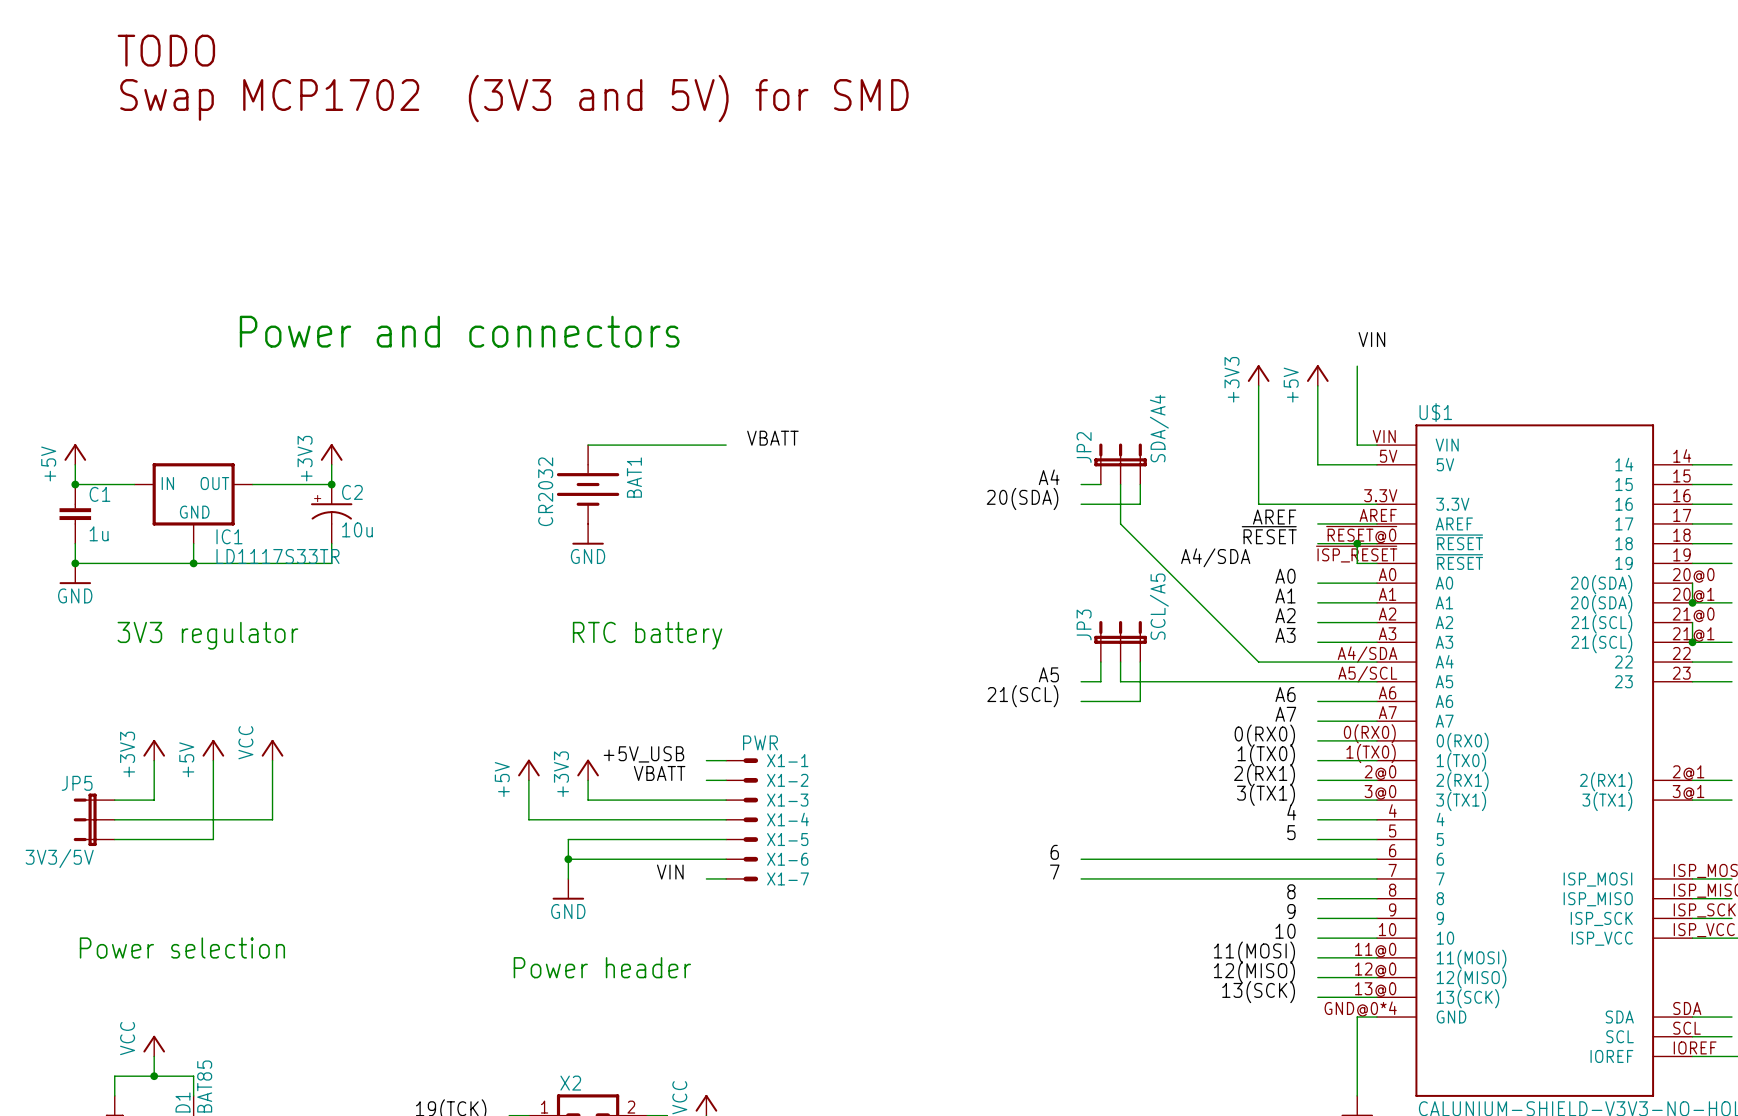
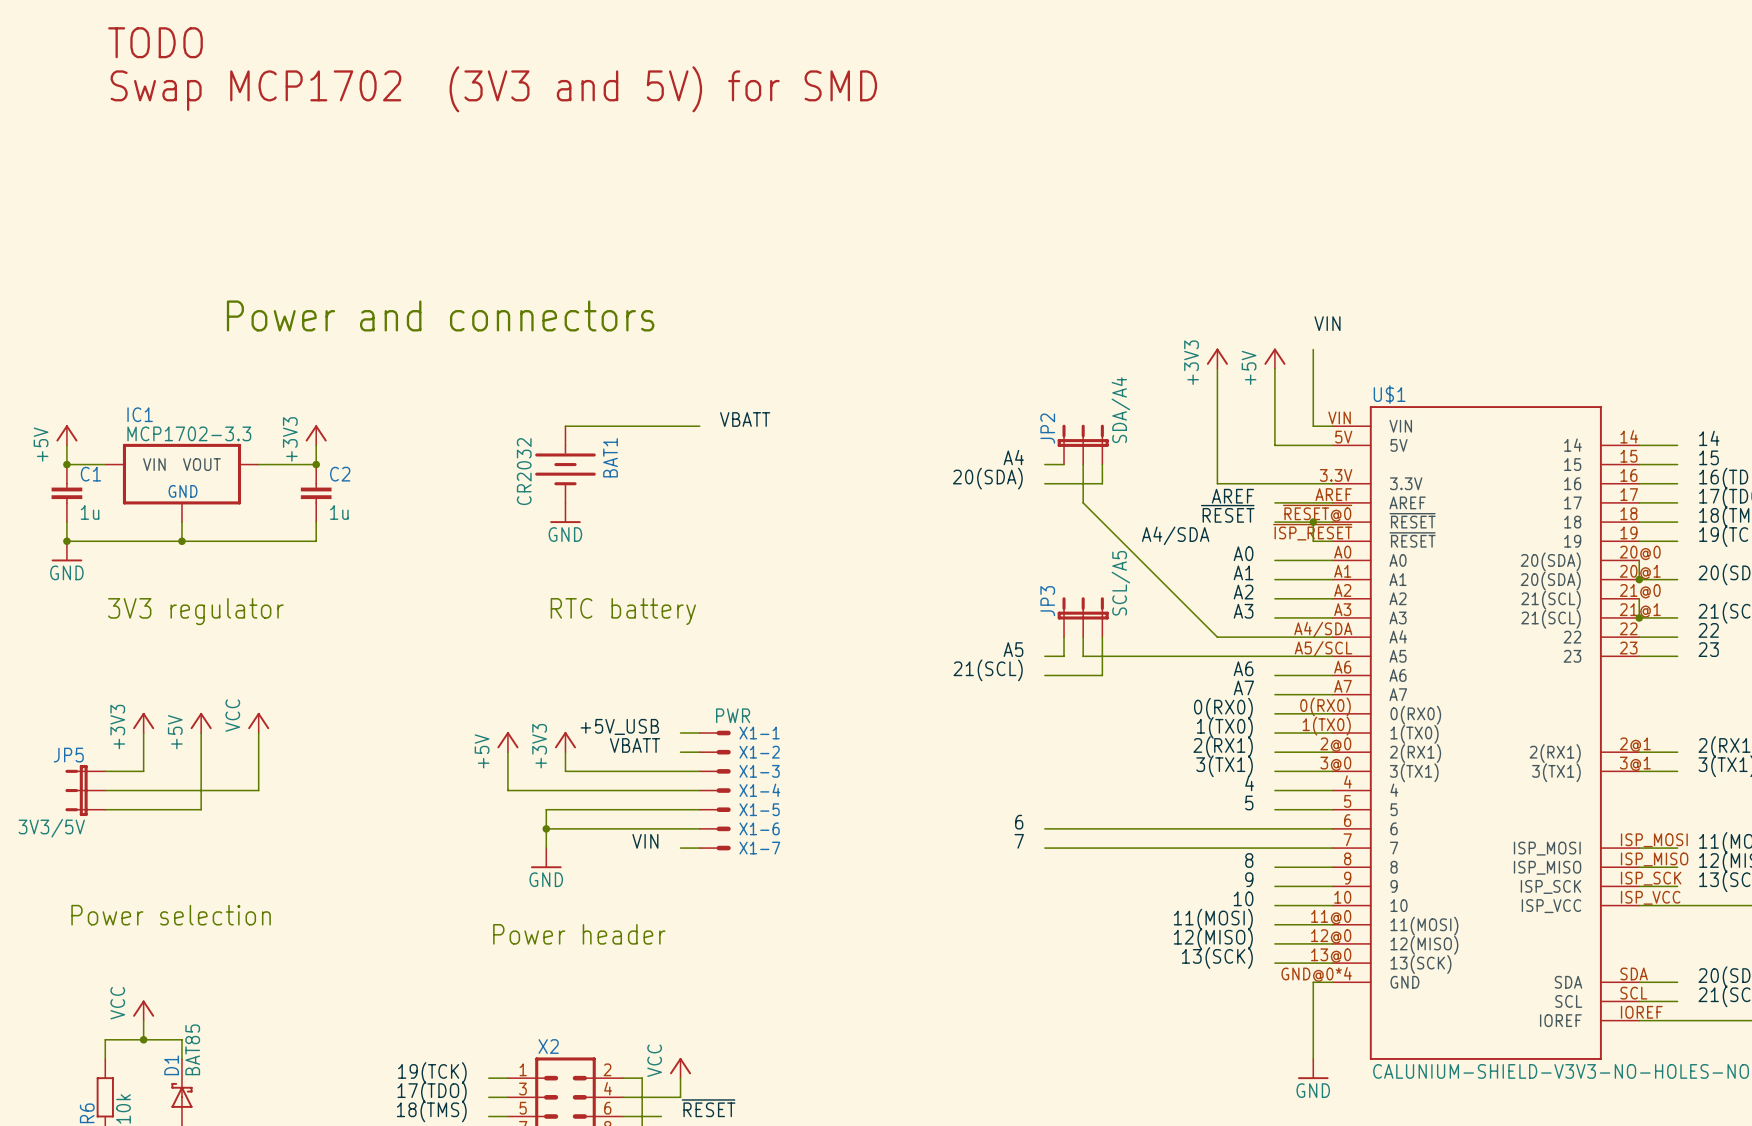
IC1 symbol: [134, 463, 253, 544] -> [105, 443, 259, 523]
C2 symbol: [310, 484, 353, 544] -> [300, 464, 332, 523]
C2 value: 10u (357, 529) -> 1u (339, 512)
IC1 name position: IC1 (229, 536) -> IC1 (140, 414)
IC1 value: LD1117S33TR (277, 556) -> MCP1702-3.3 (189, 433)

